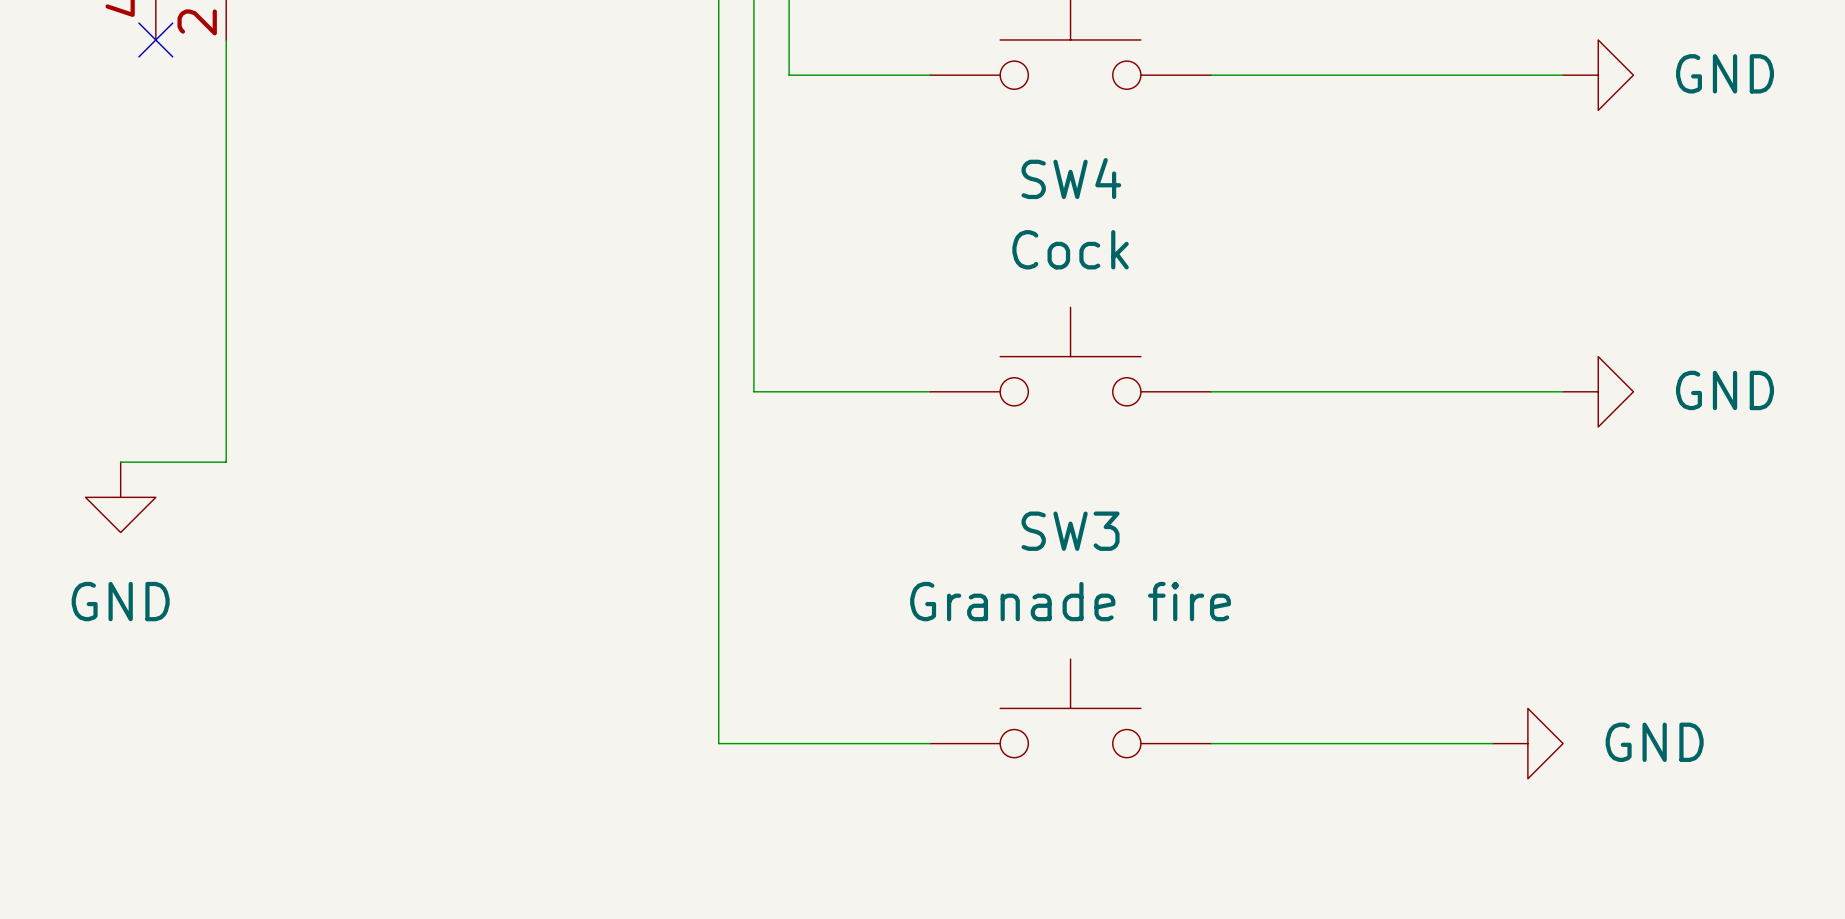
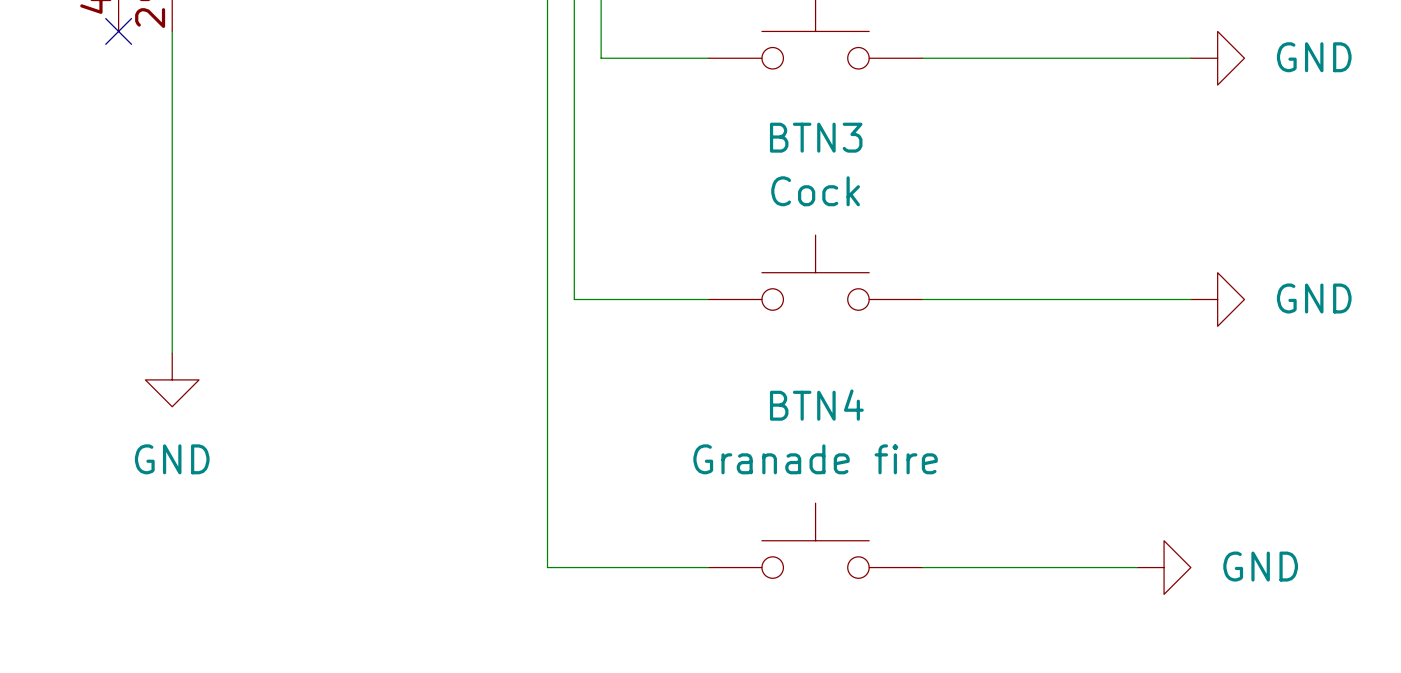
SW4 name: SW4 (1071, 178) -> BTN3 (816, 137)
wire: (120, 462) (226, 462) -> none
power symbol position: GND (120, 497) -> GND (172, 379)
SW3 name: SW3 (1070, 531) -> BTN4 (816, 405)

